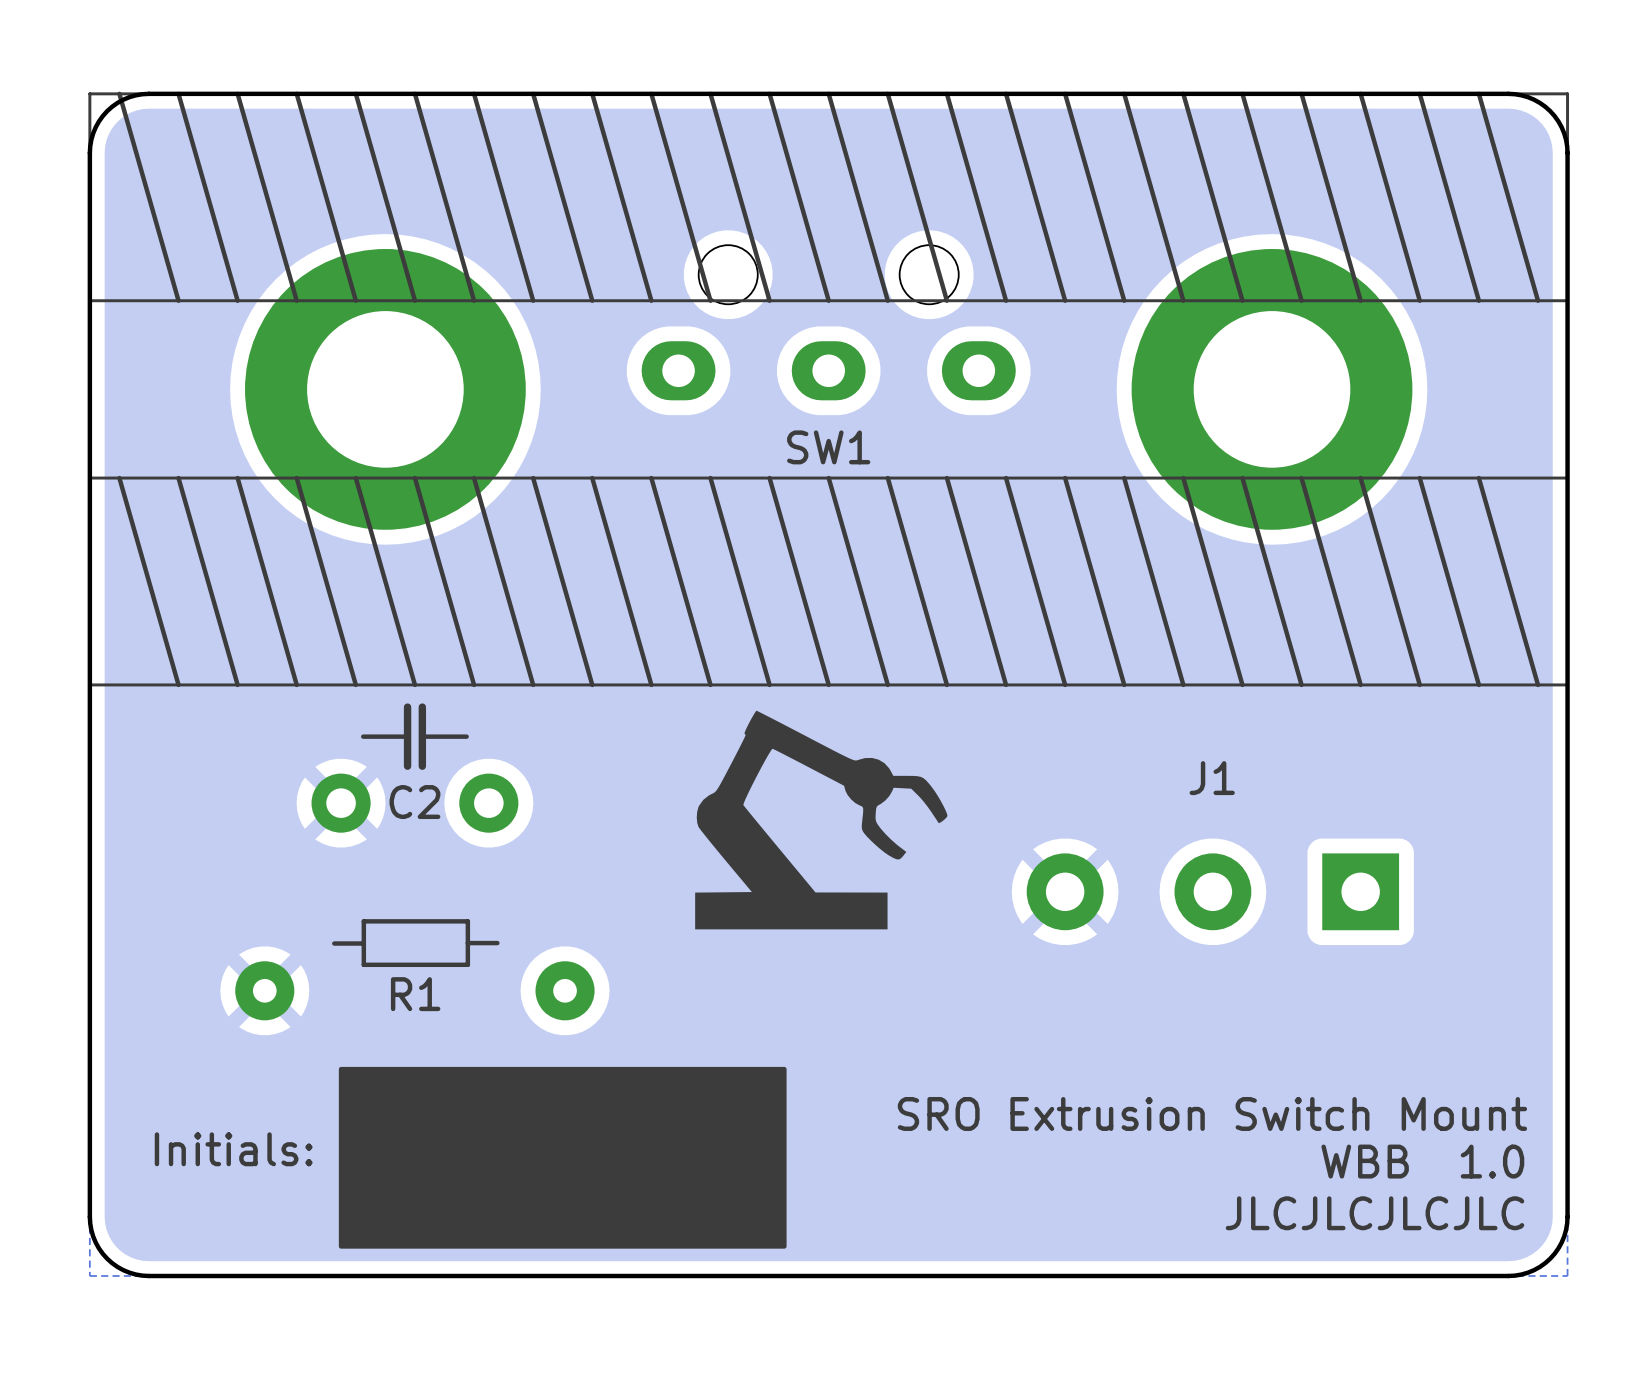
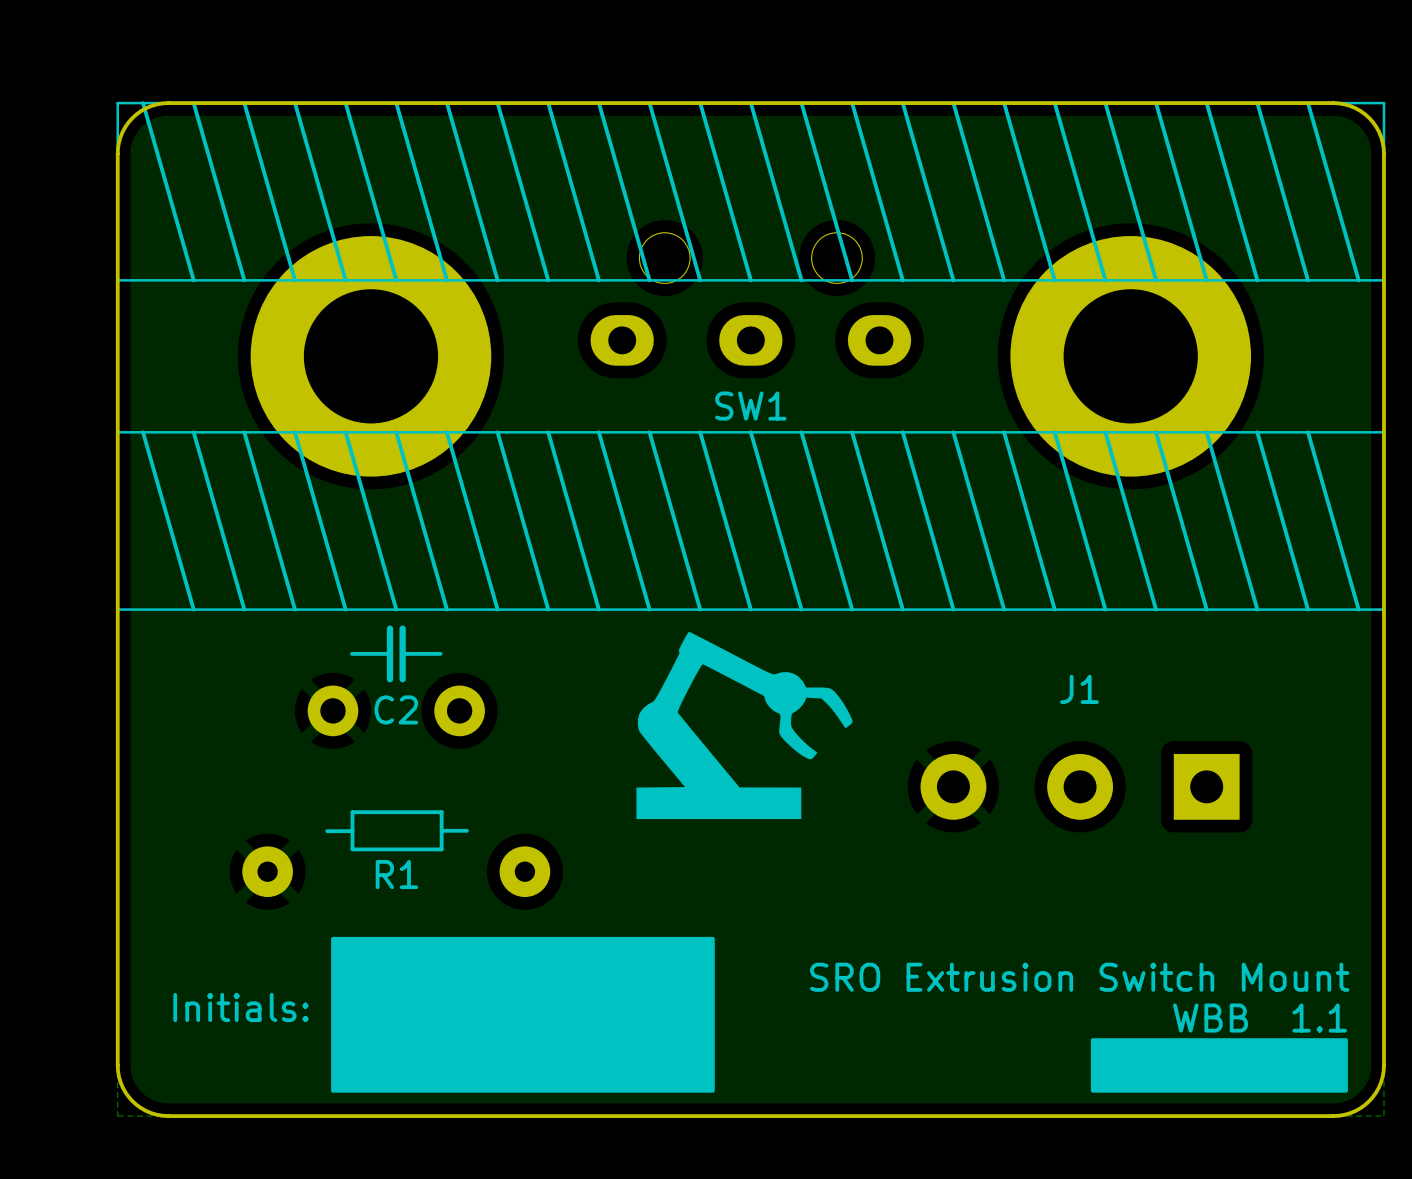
text: WBB 1.0 (1422, 1161) -> WBB 1.1 (1259, 1018)
drawing: none -> [1090, 1038, 1348, 1093]
text: JLCJLCJLCJLC (1374, 1213) -> none

